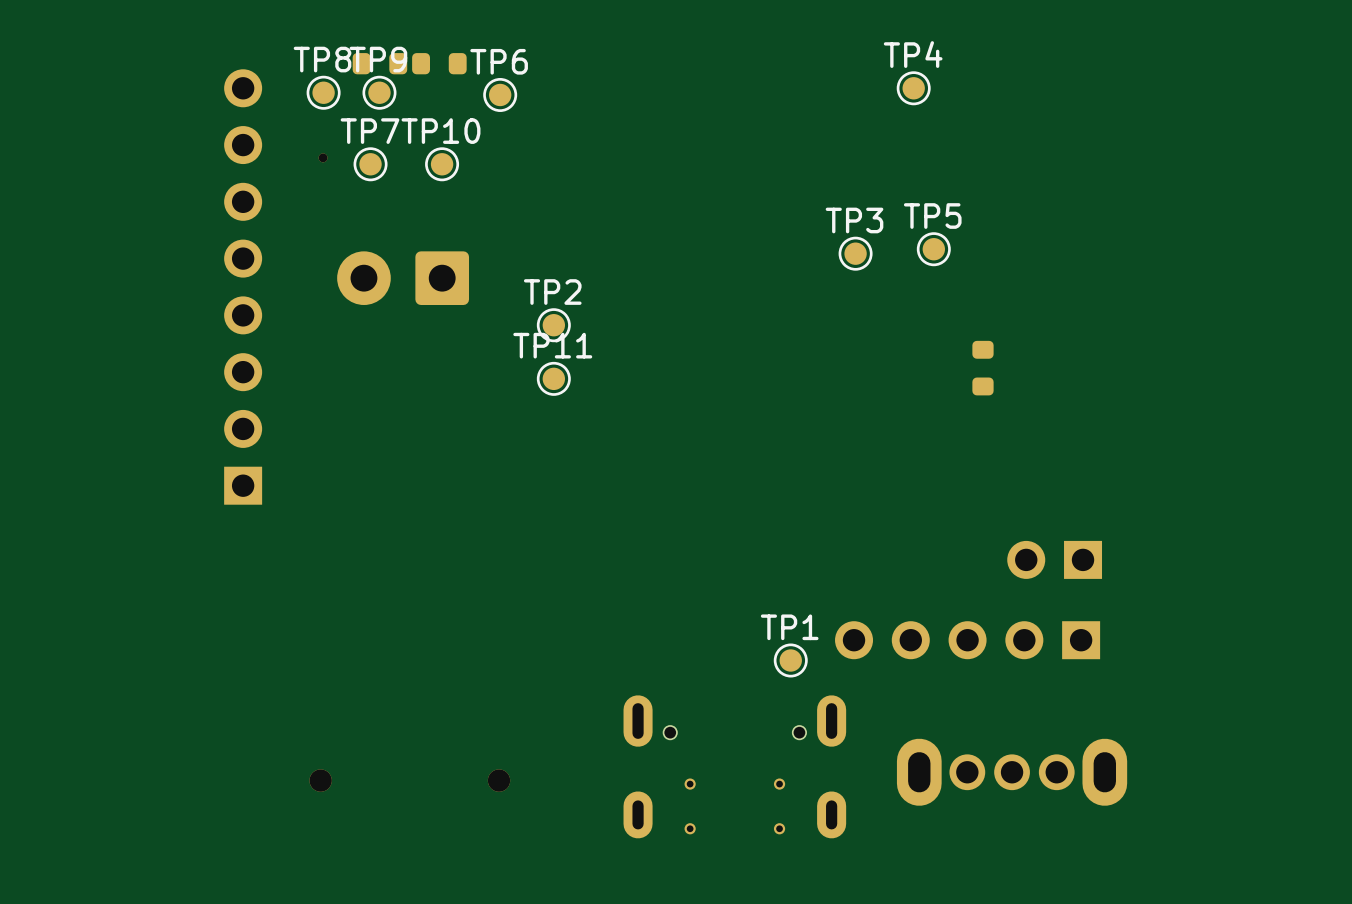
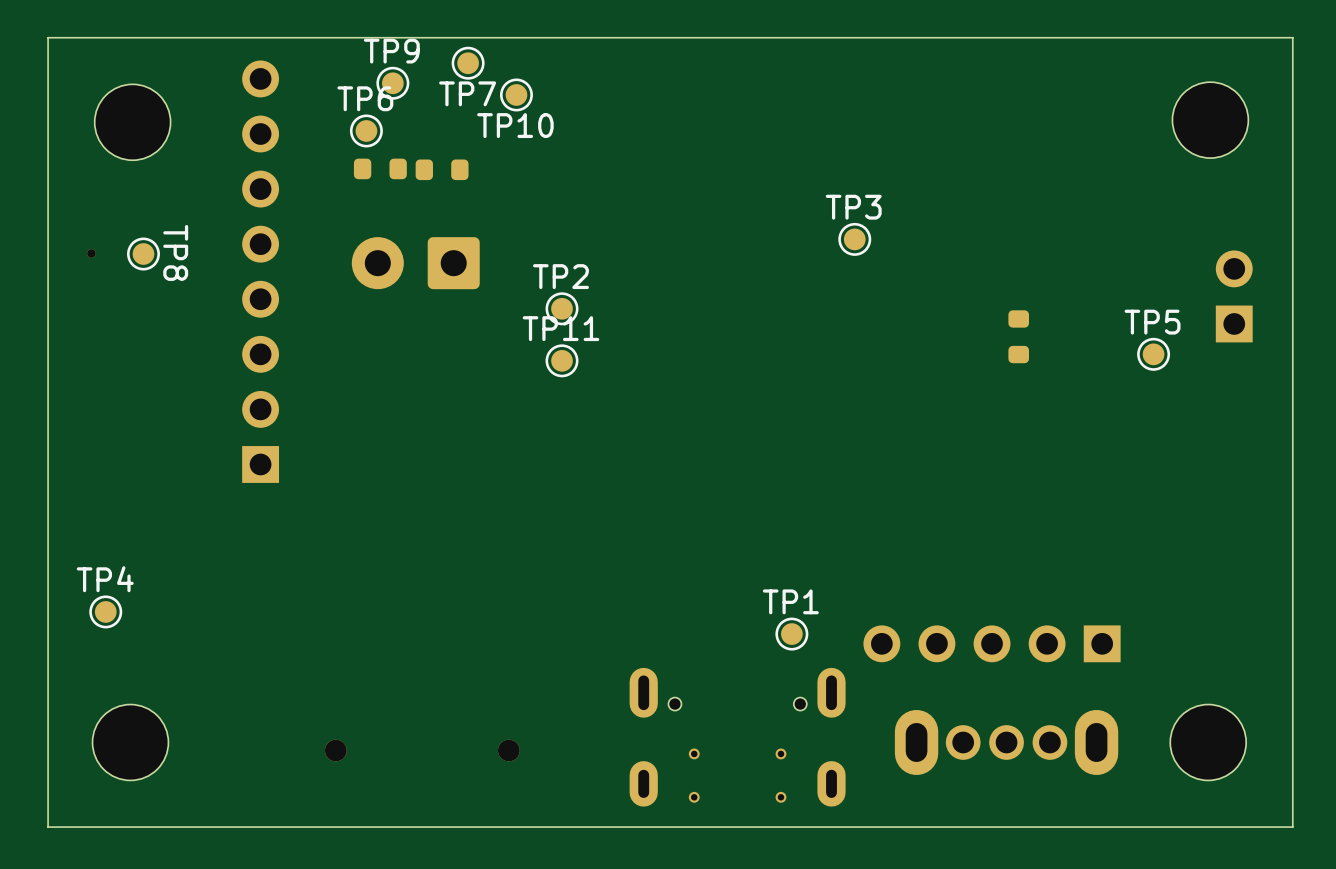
board edge: none -> (1292, 37) (1292, 827) (48, 827) (48, 37) (1292, 37)
TP8 name rotation: 0° (322, 59) -> 90° clockwise (175, 252)
part: (379, 63) -> none
part: (439, 63) -> none
TP4 position: (913, 88) -> (105, 611)
TP8 position: (323, 92) -> (143, 254)
TP6 position: (500, 94) -> (366, 130)
part: none -> (1210, 120)
TP7 name position: TP7 (370, 131) -> TP7 (467, 93)
TP10 name position: TP10 (441, 131) -> TP10 (515, 125)
part: none -> (132, 122)
part position: (323, 157) -> (91, 253)
TP7 position: (370, 164) -> (468, 63)
TP10 position: (442, 164) -> (516, 94)
part: none -> (380, 168)
part: none -> (442, 169)
TP5 position: (933, 249) -> (1153, 354)
part position: (982, 368) -> (1018, 336)
part rotation: 0° (1054, 559) -> 90° clockwise (1234, 296)
part position: (1054, 559) -> (1234, 296)
part position: (967, 640) -> (992, 643)
part: none -> (130, 742)
part: none -> (1208, 742)

